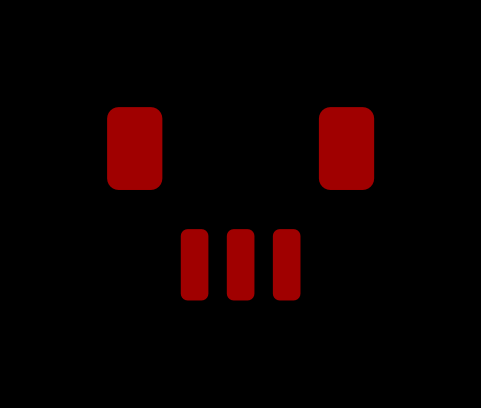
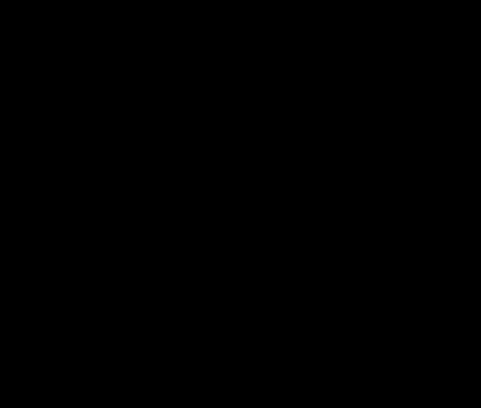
part: (240, 203) -> none

